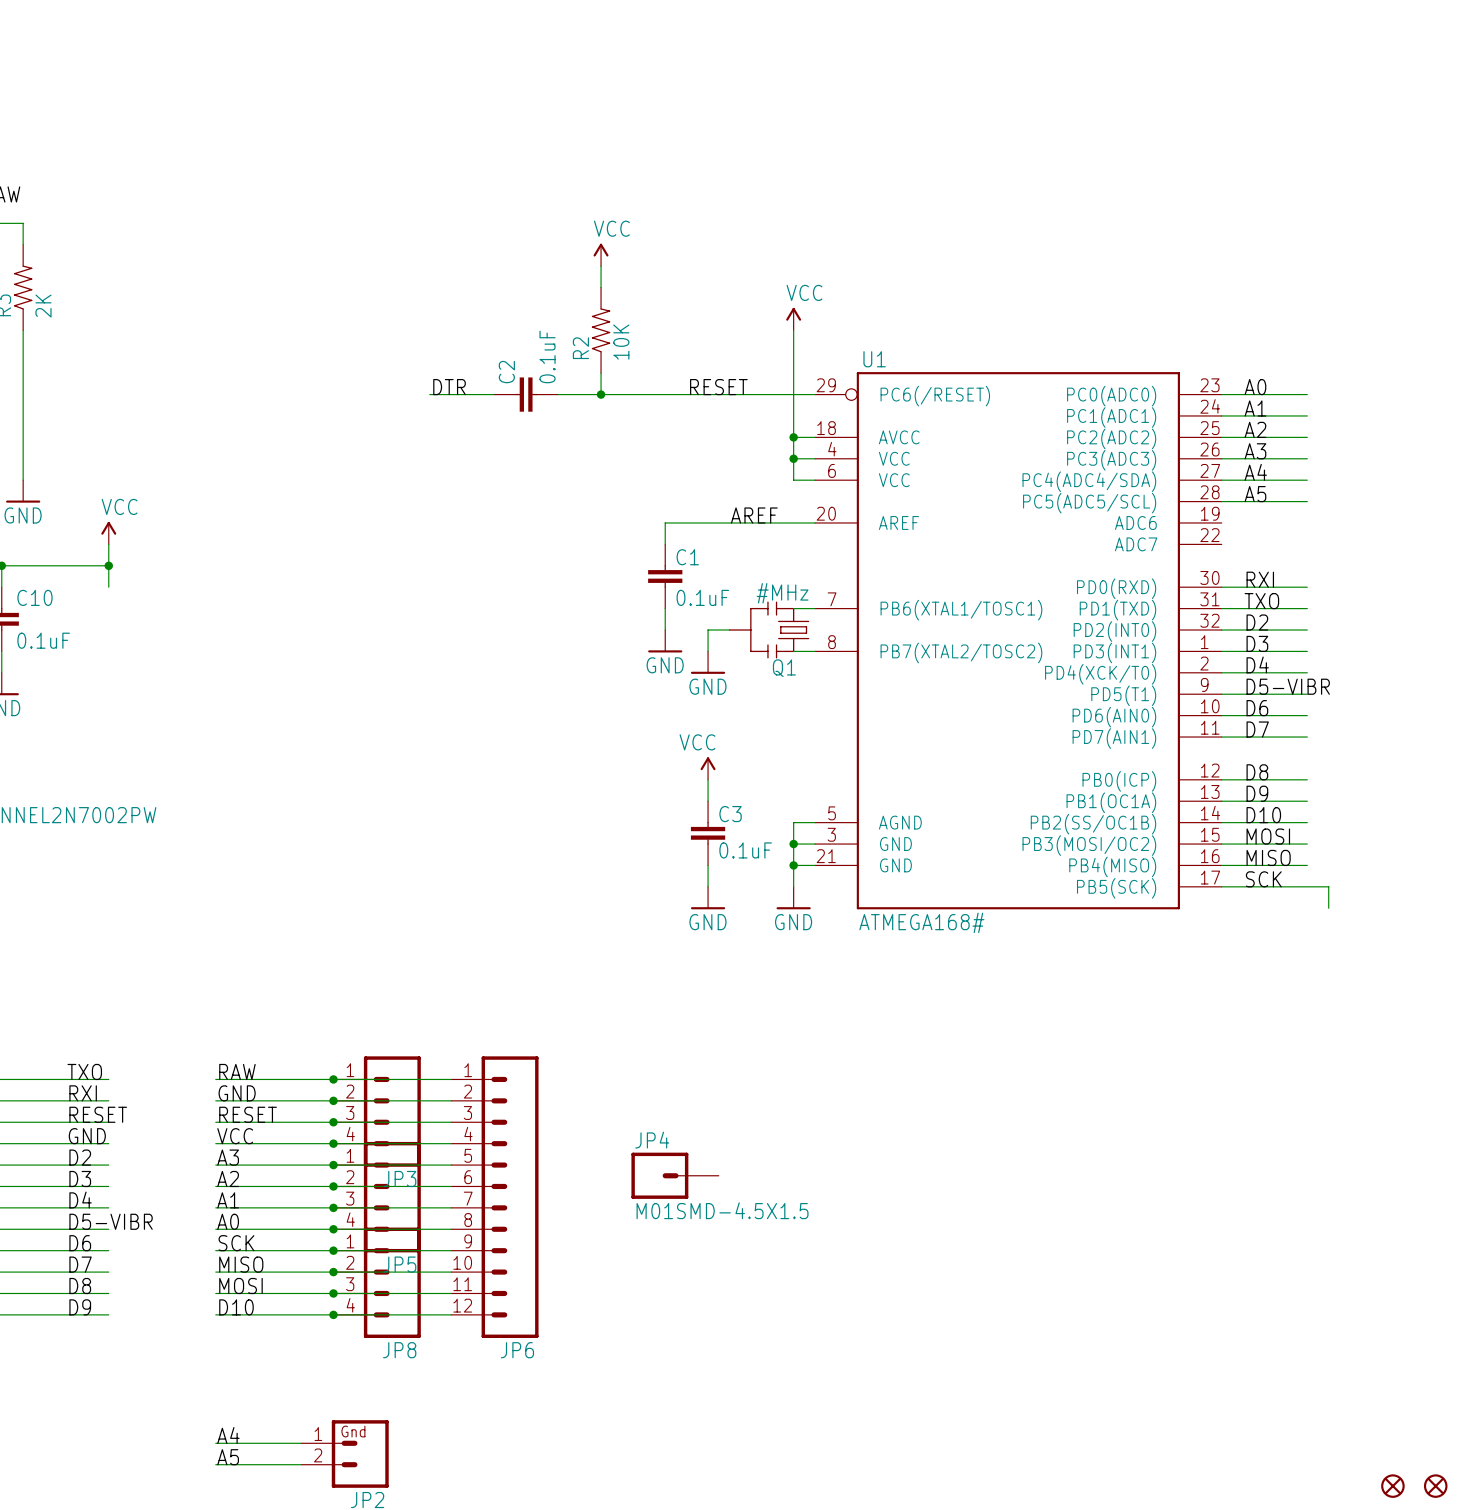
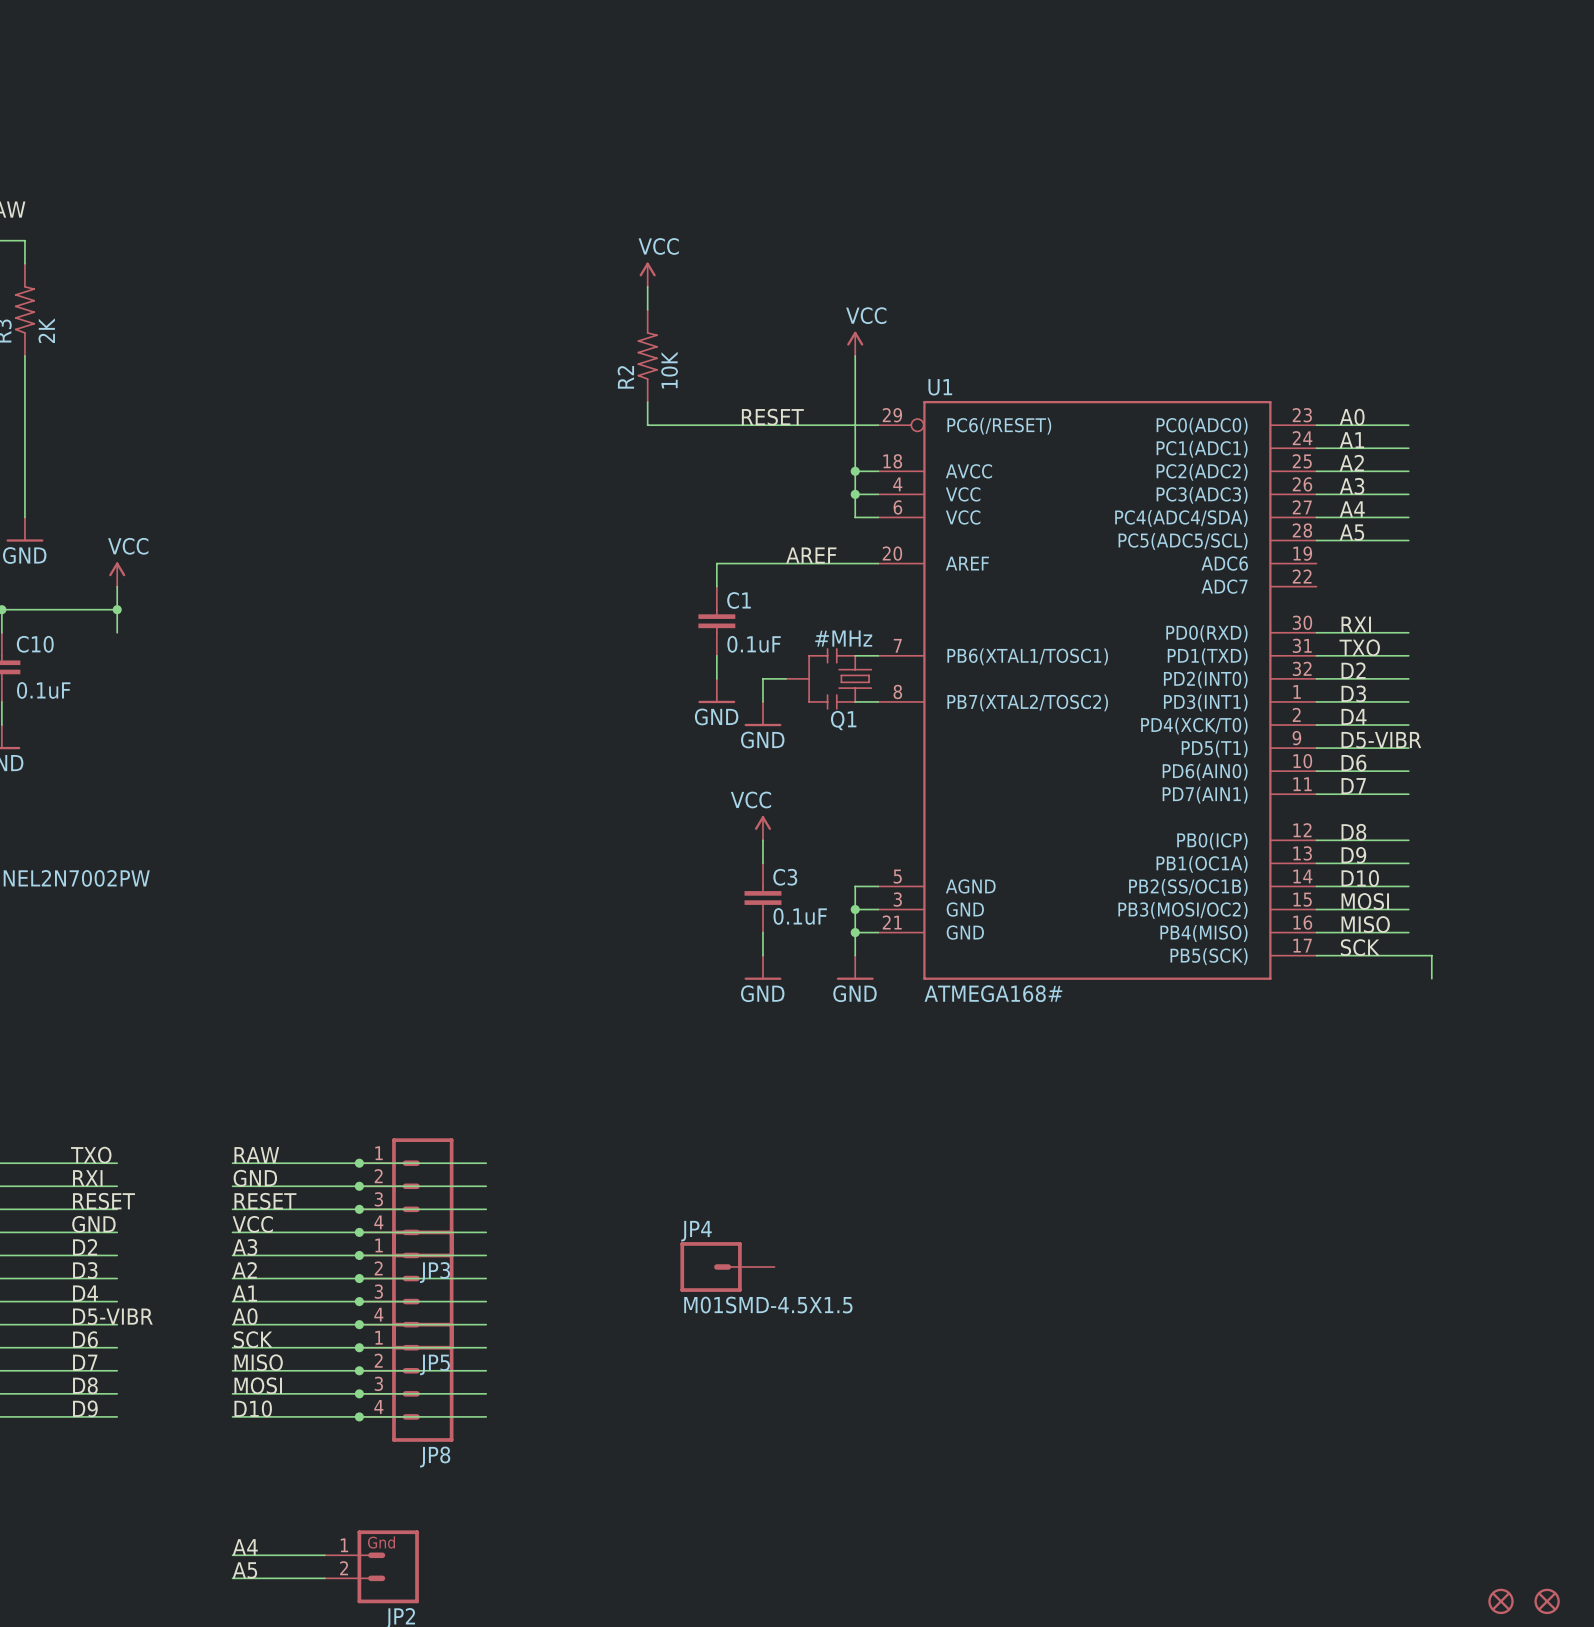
label: DTR (449, 387) -> none
wire: (429, 394) (494, 394) -> none
C2: 0.1uF (526, 394) -> none
wire: (558, 394) (601, 394) -> none
junction: (601, 394) -> none
JP6: (494, 1197) -> none

